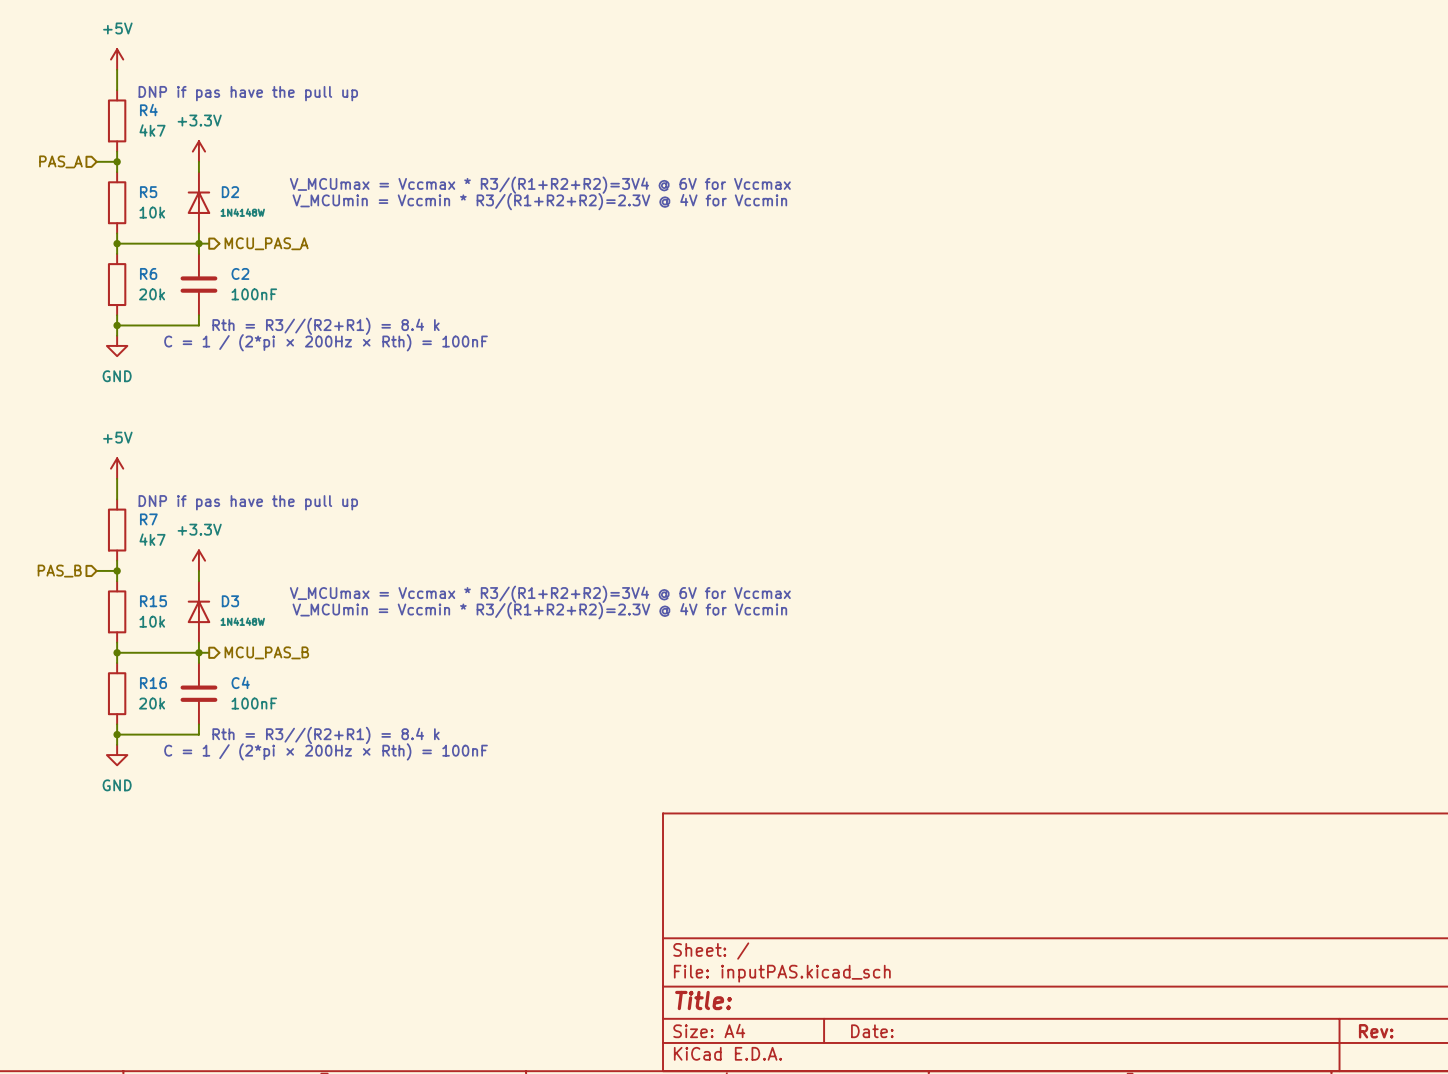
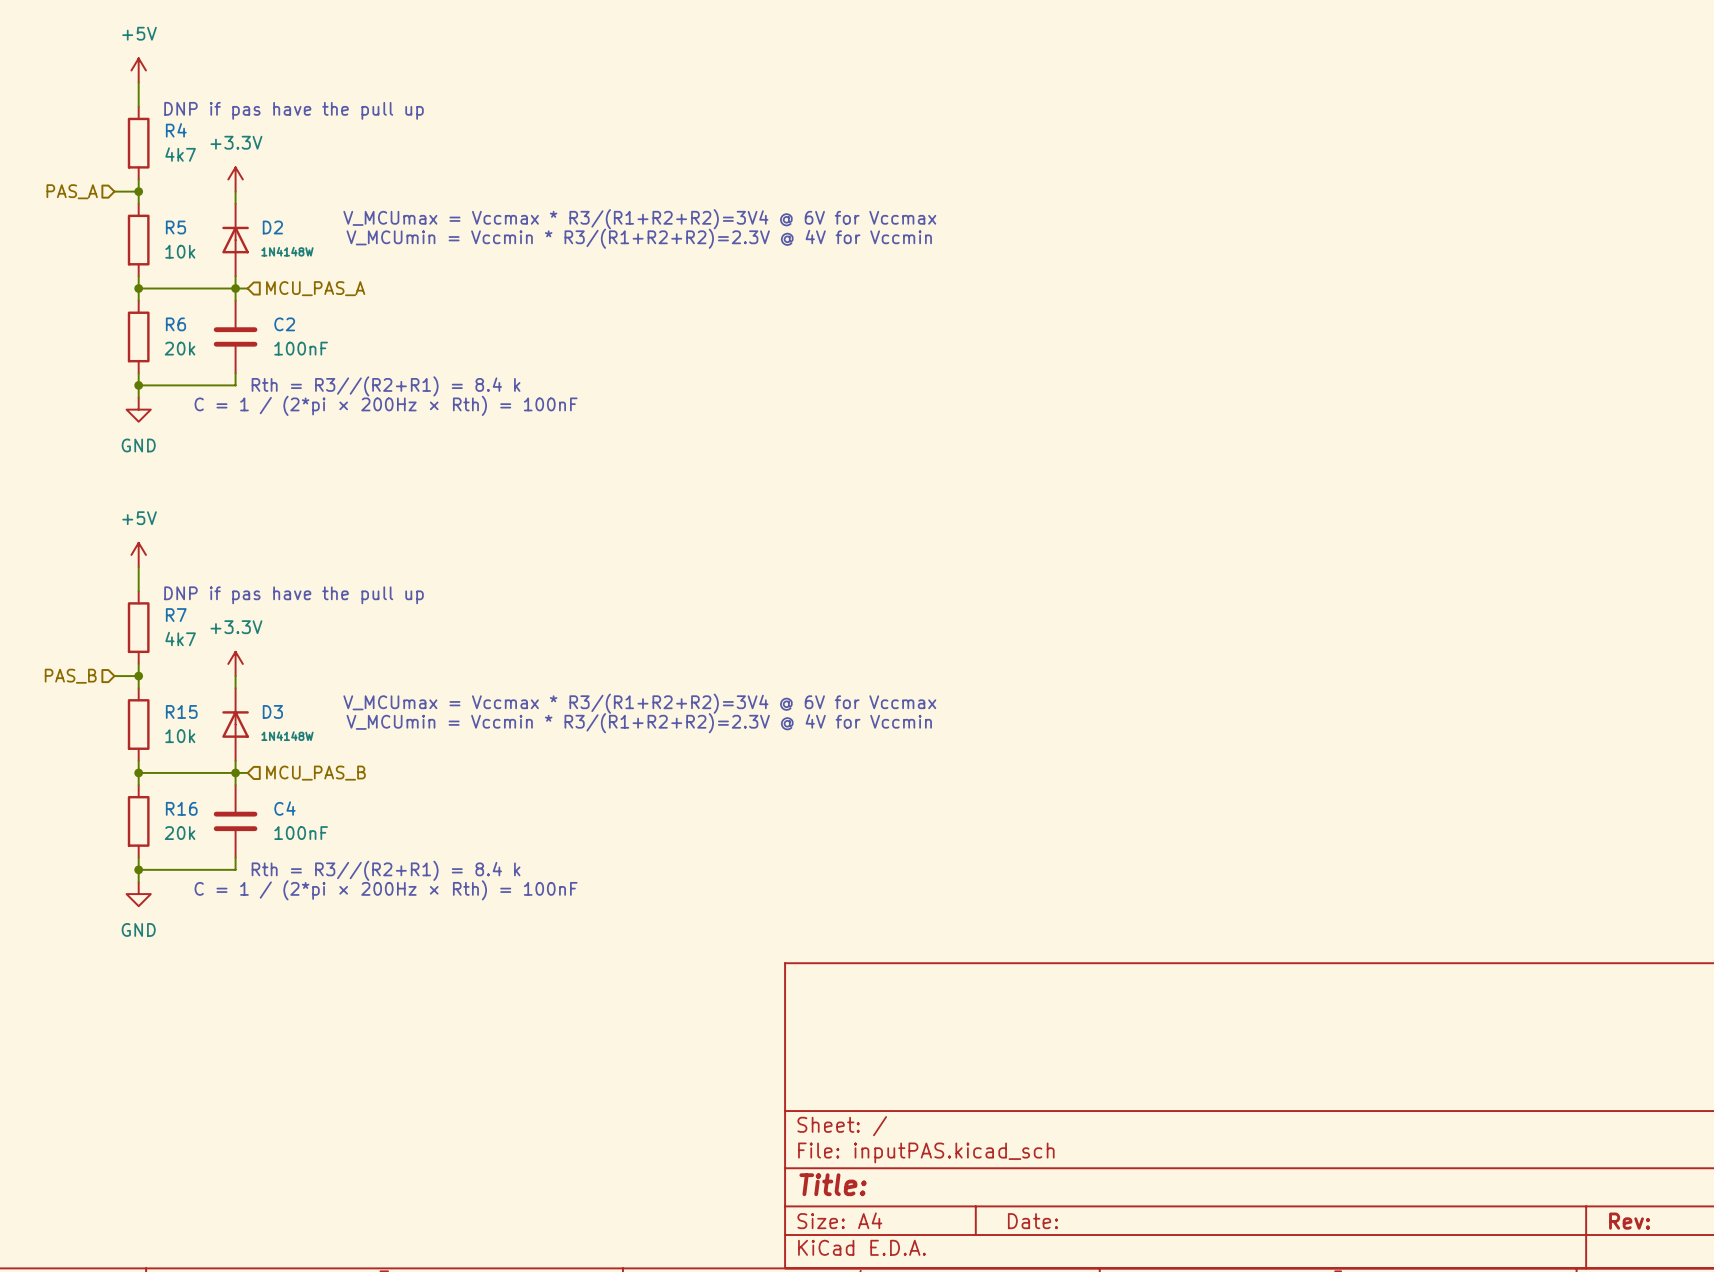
hierarchical label shape: output (266, 243) -> input (315, 288)
hierarchical label shape: output (266, 652) -> input (315, 773)

